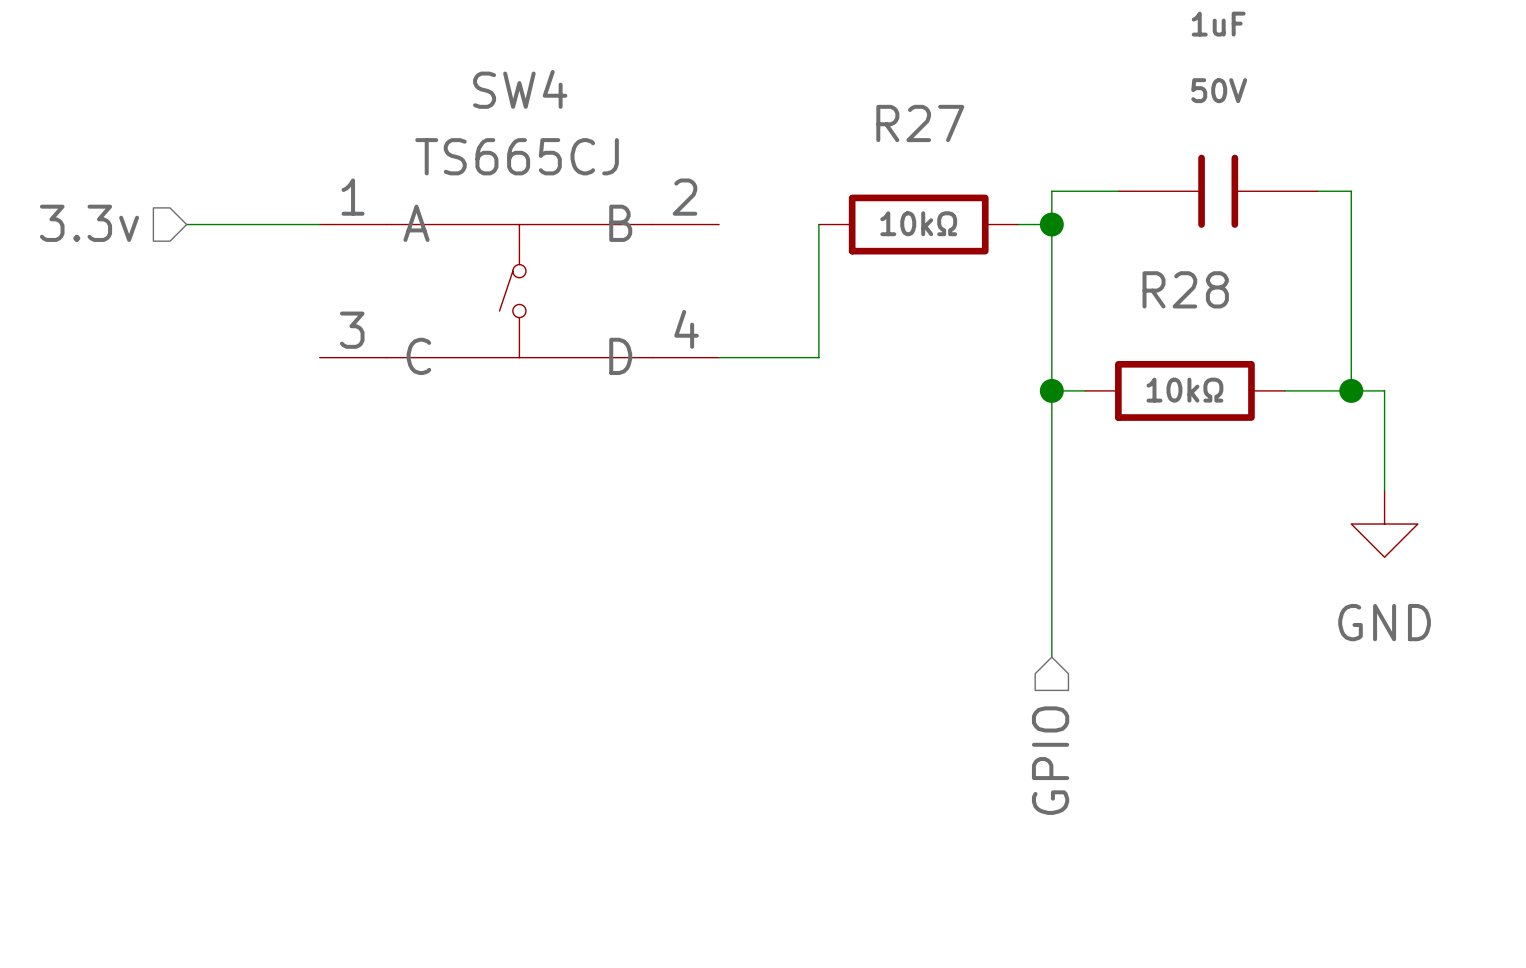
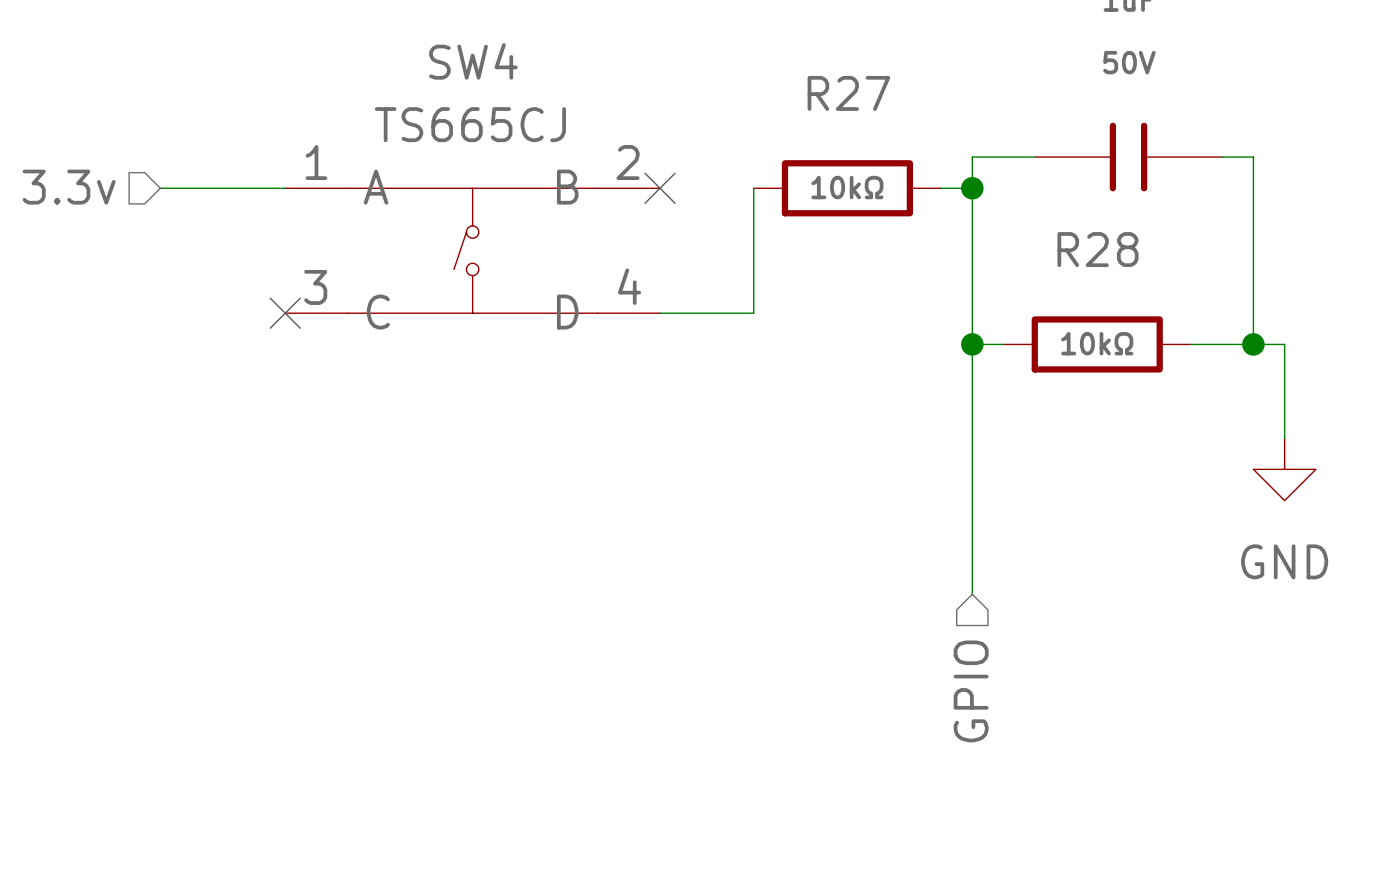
no-connect mark: none -> (660, 188)
no-connect mark: none -> (285, 313)

